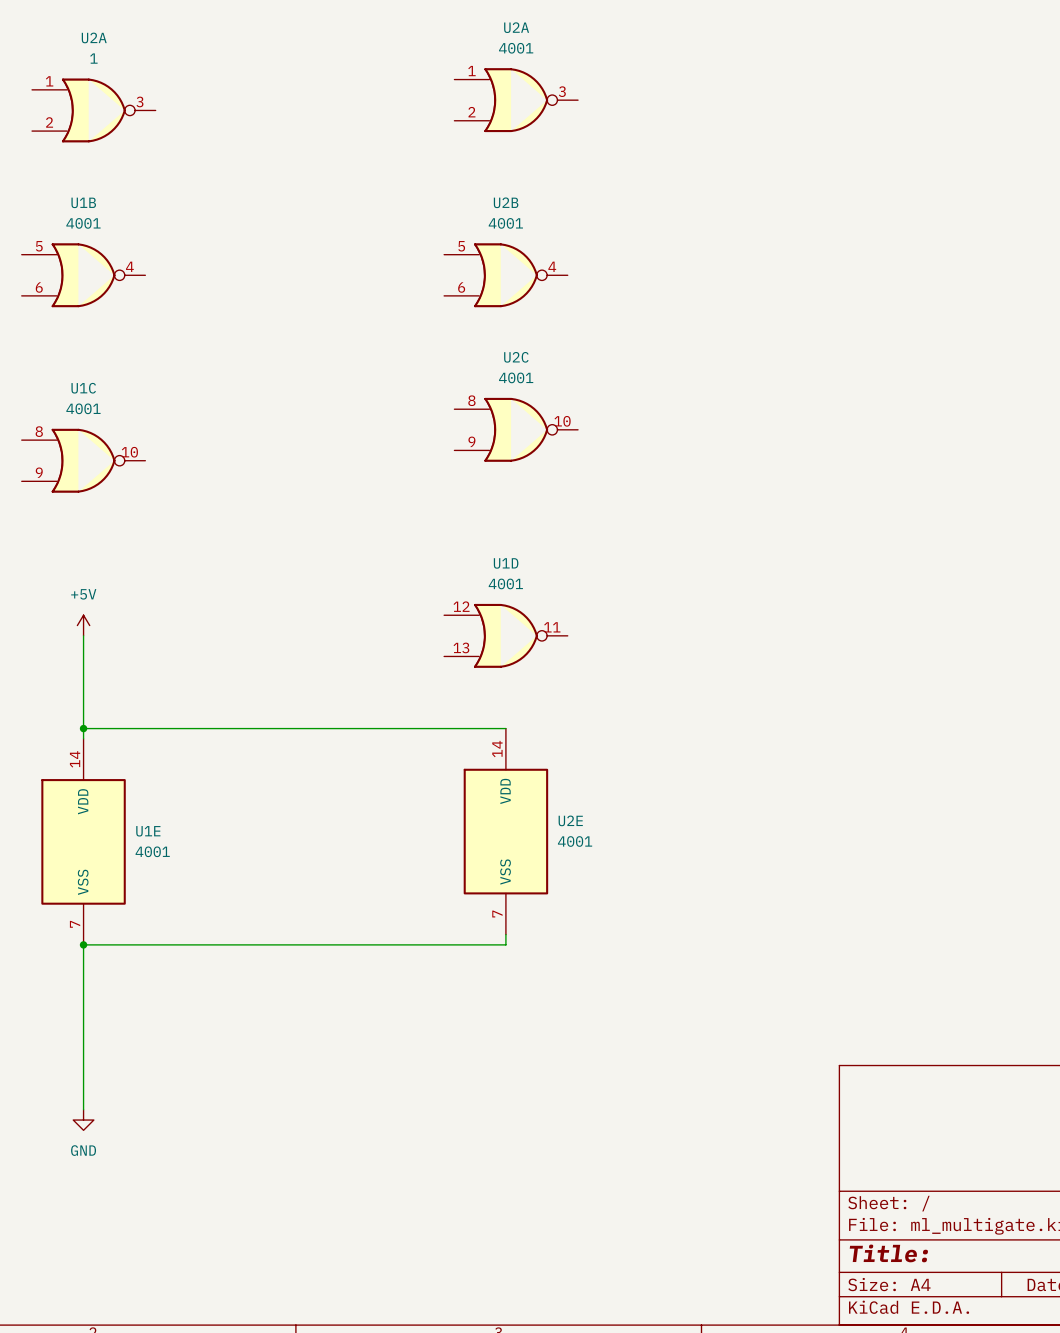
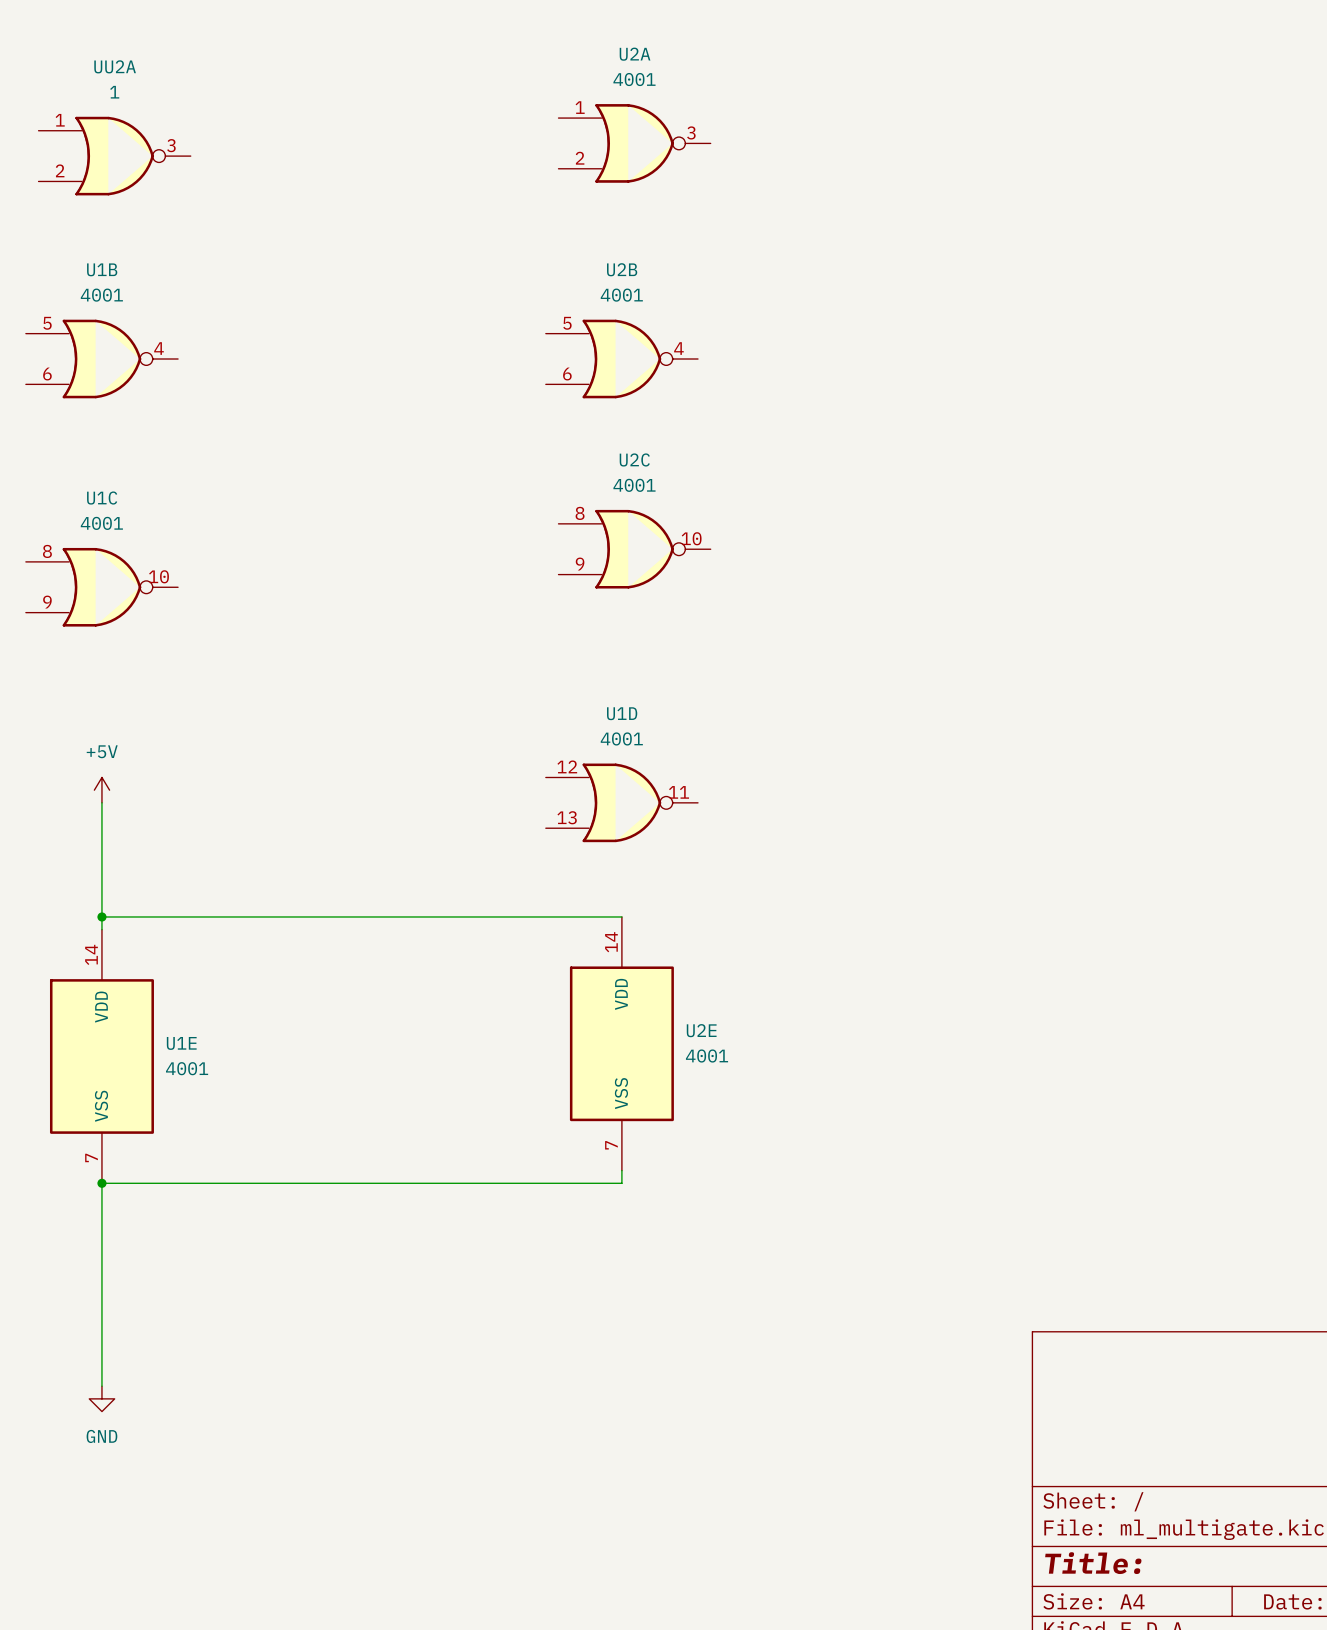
U2A name: U2A (94, 37) -> UU2A (115, 66)

